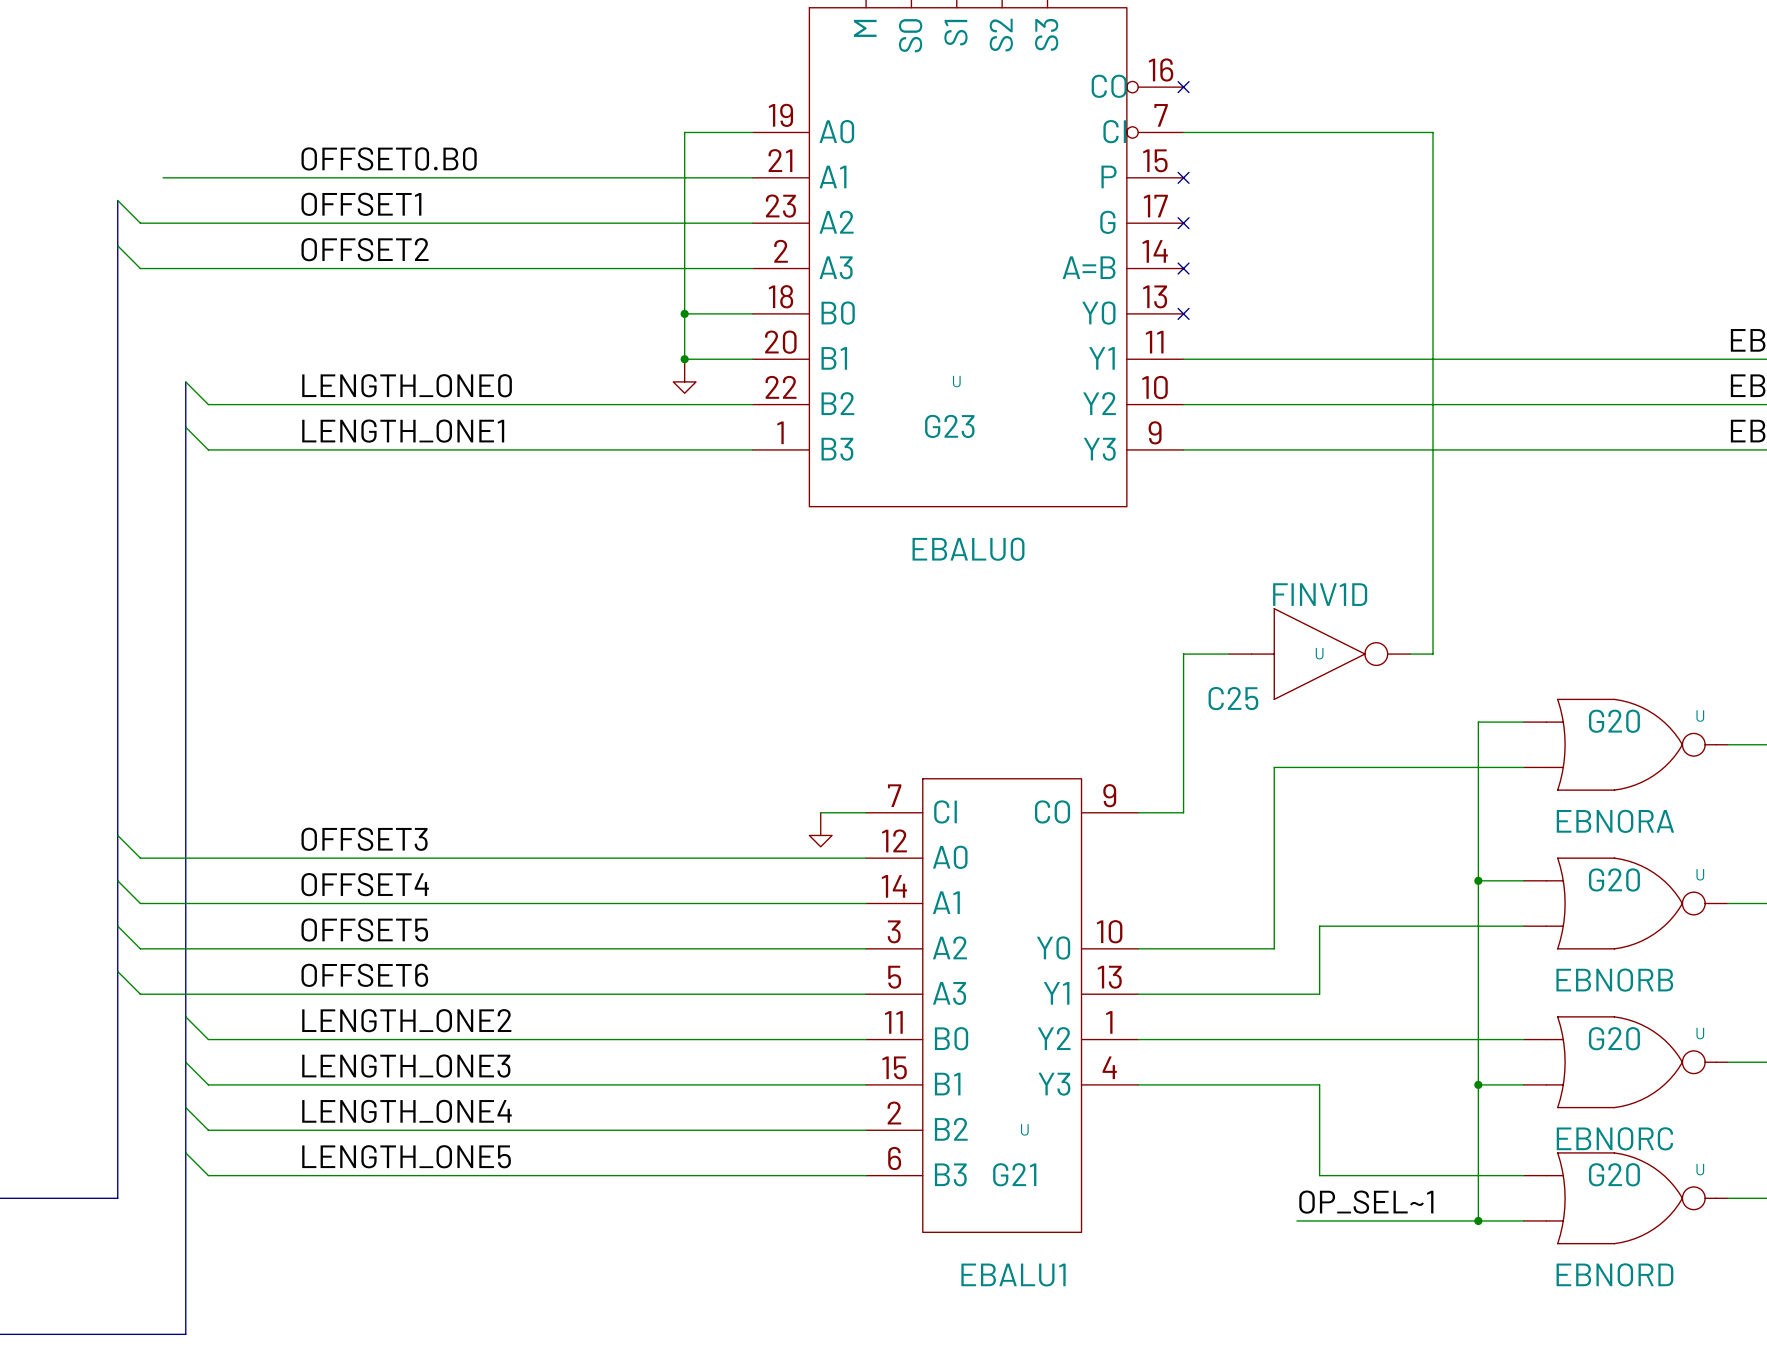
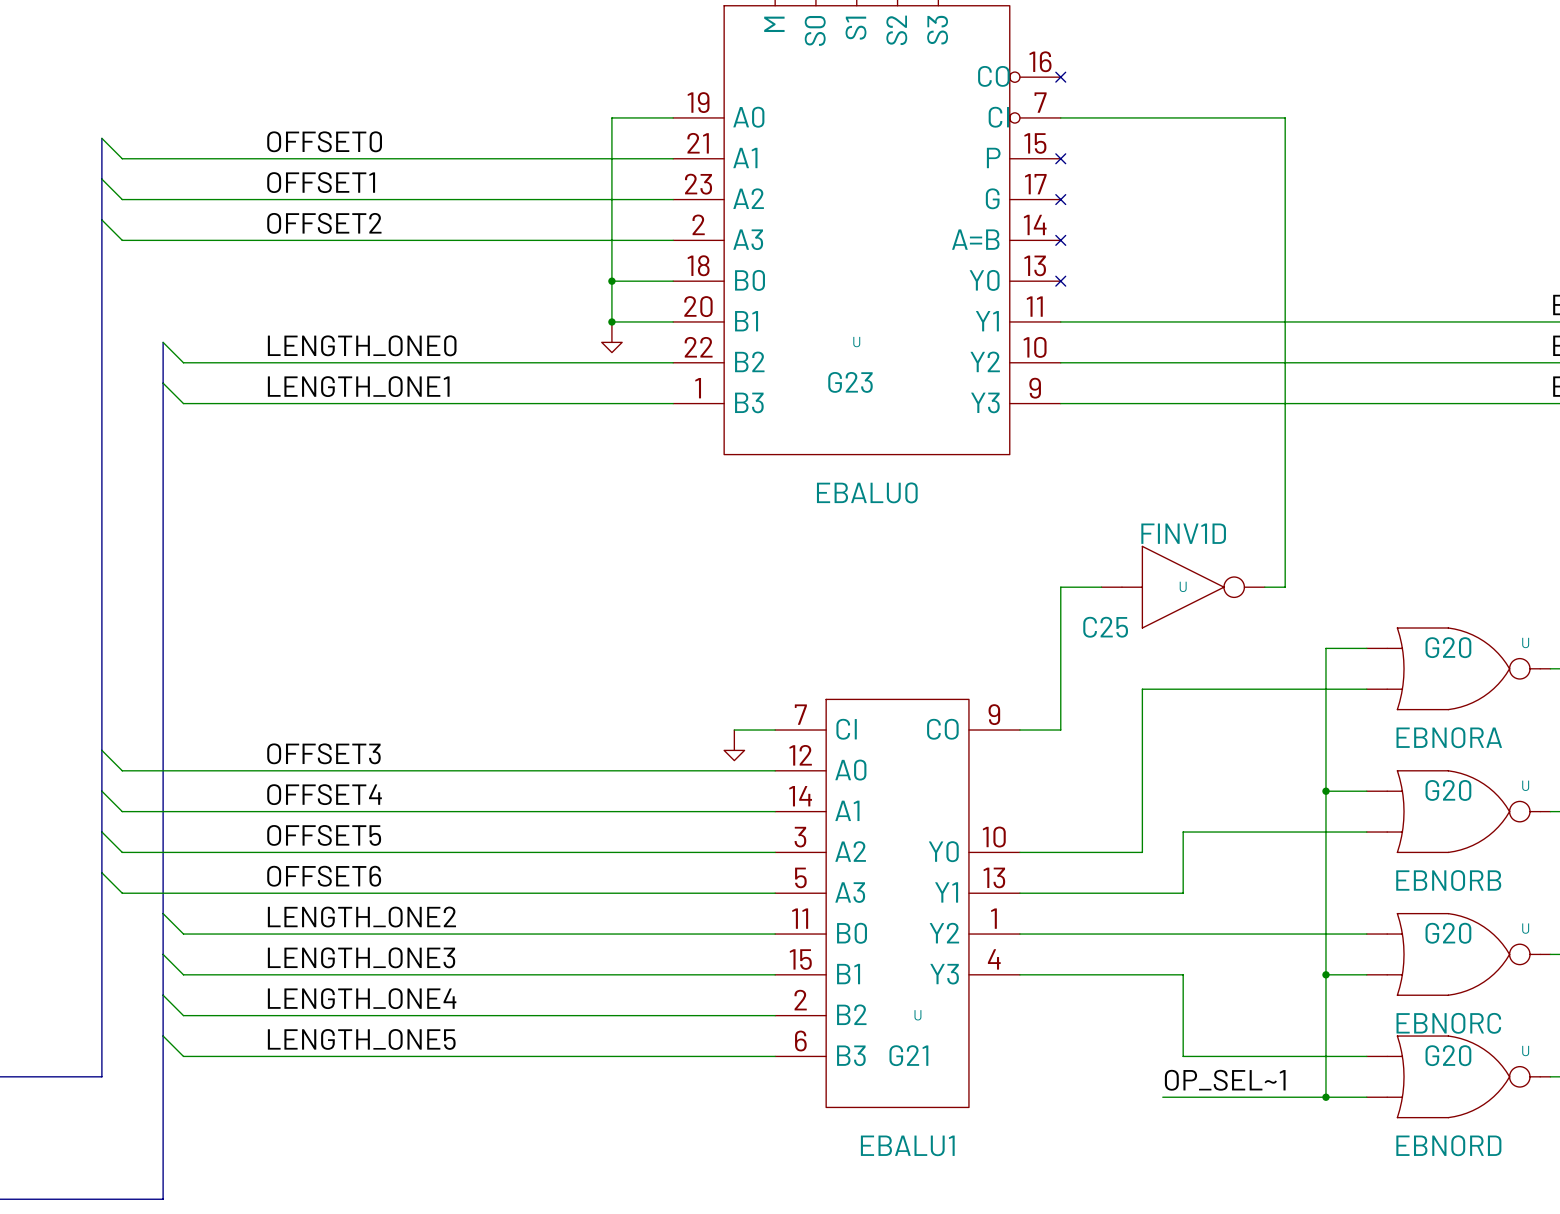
wire: none -> (101, 138) (122, 158) (142, 158)
bus: none -> (101, 138) (101, 179)
label: OFFSET0.B0 (389, 158) -> OFFSET0 (324, 141)

